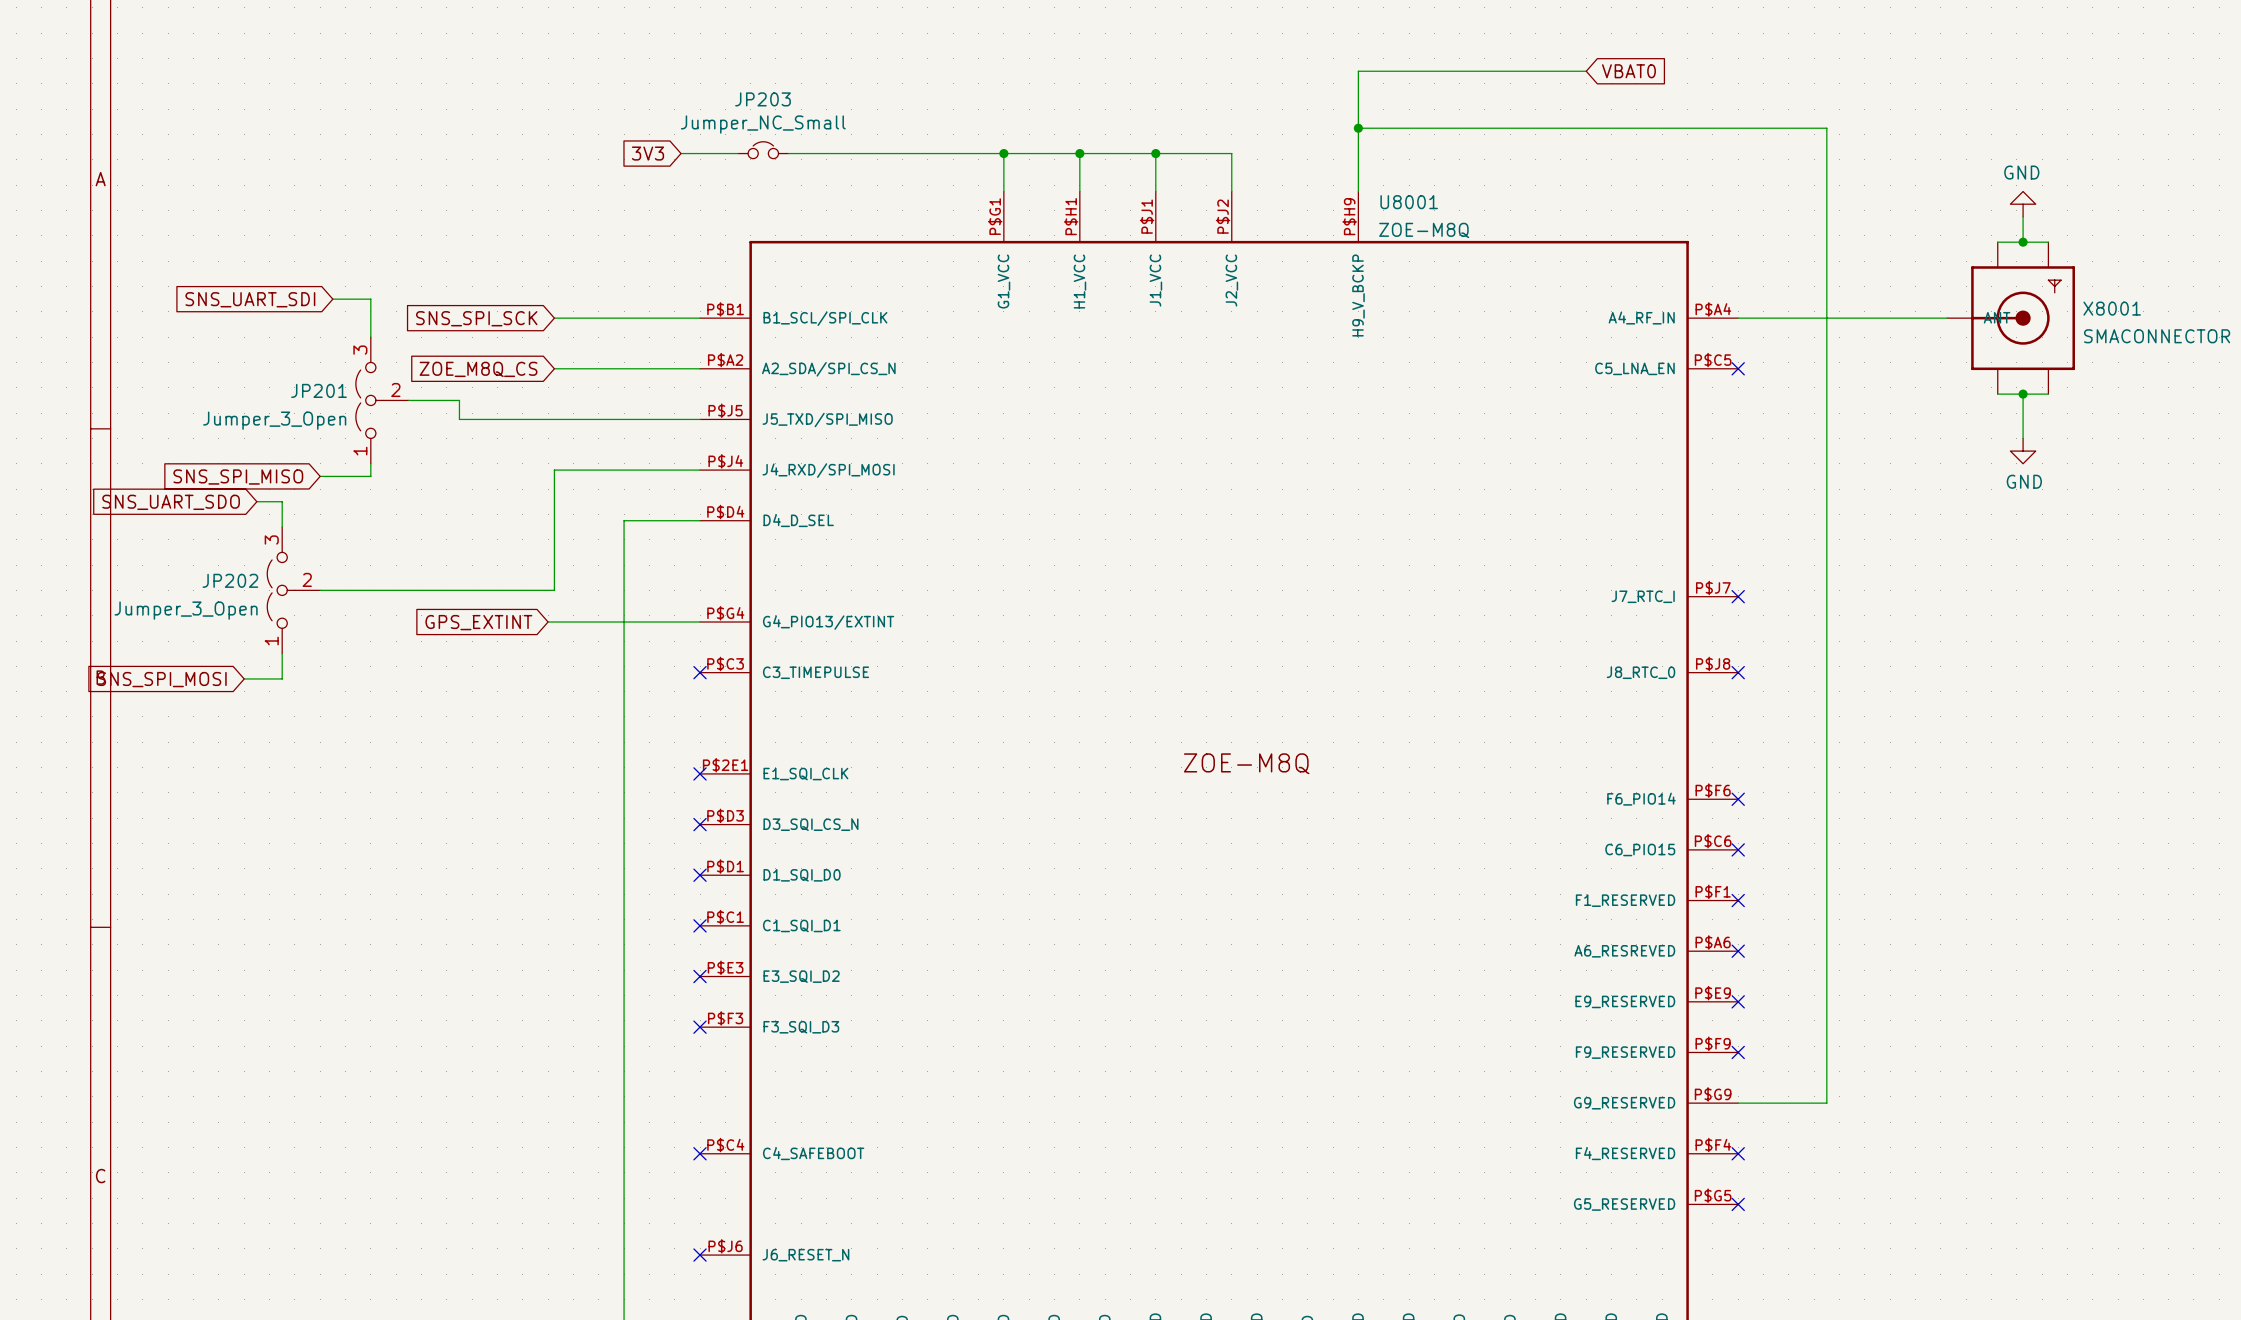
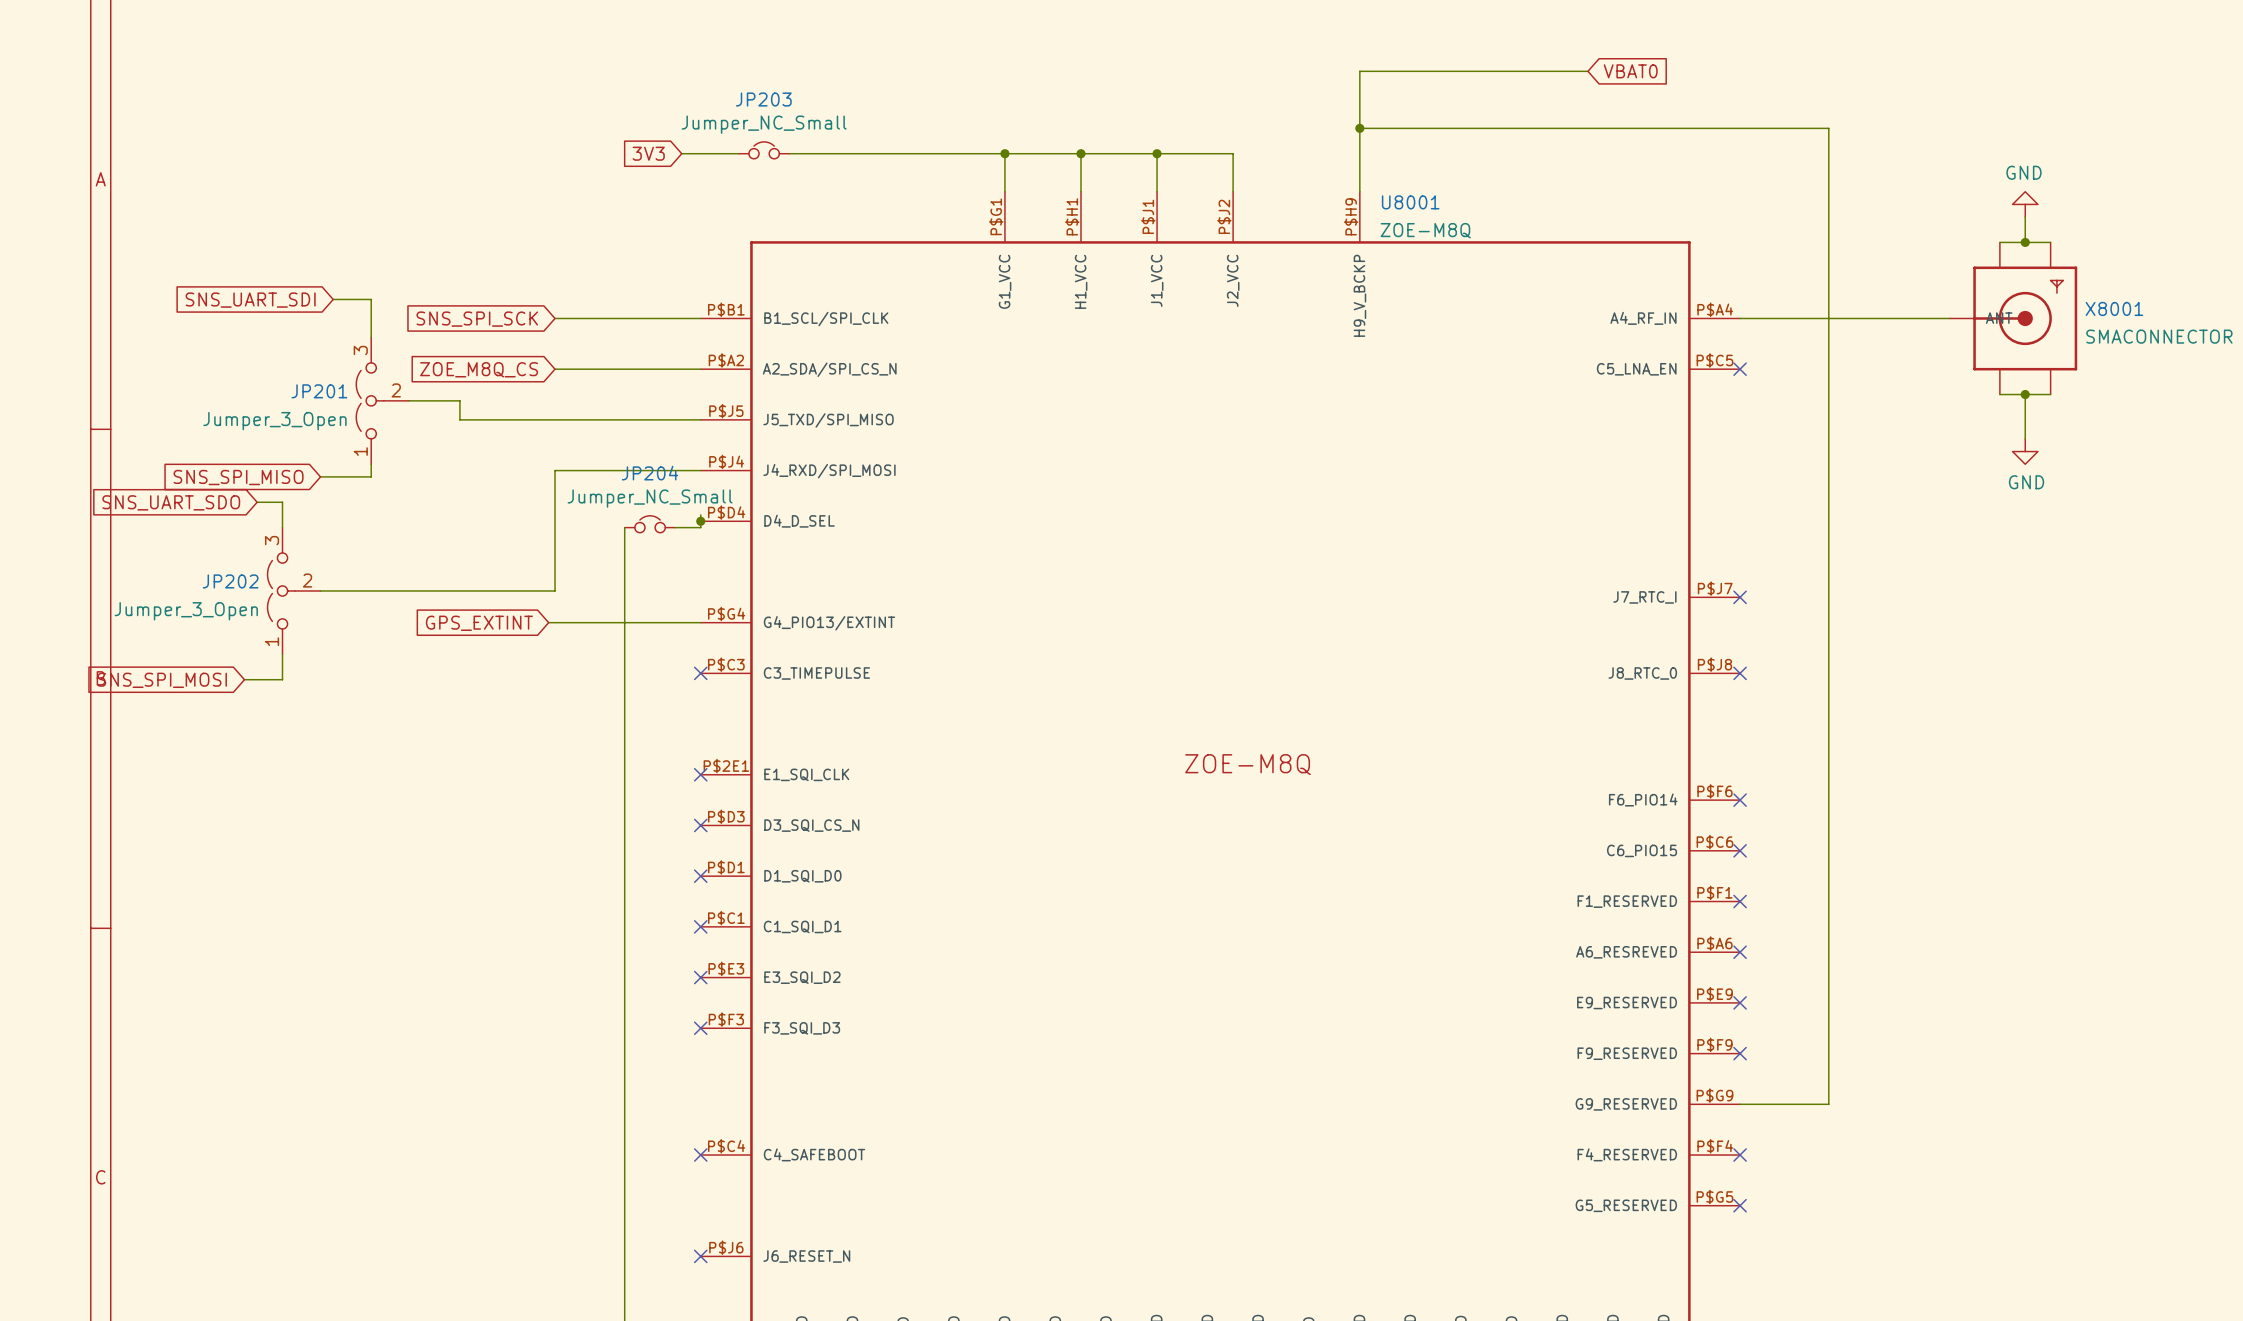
wire: none -> (700, 514) (700, 527) (675, 527)
wire: (700, 520) (624, 520) (624, 527) -> none
junction: none -> (700, 521)
JP204: none -> Jumper_NC_Small (650, 524)

